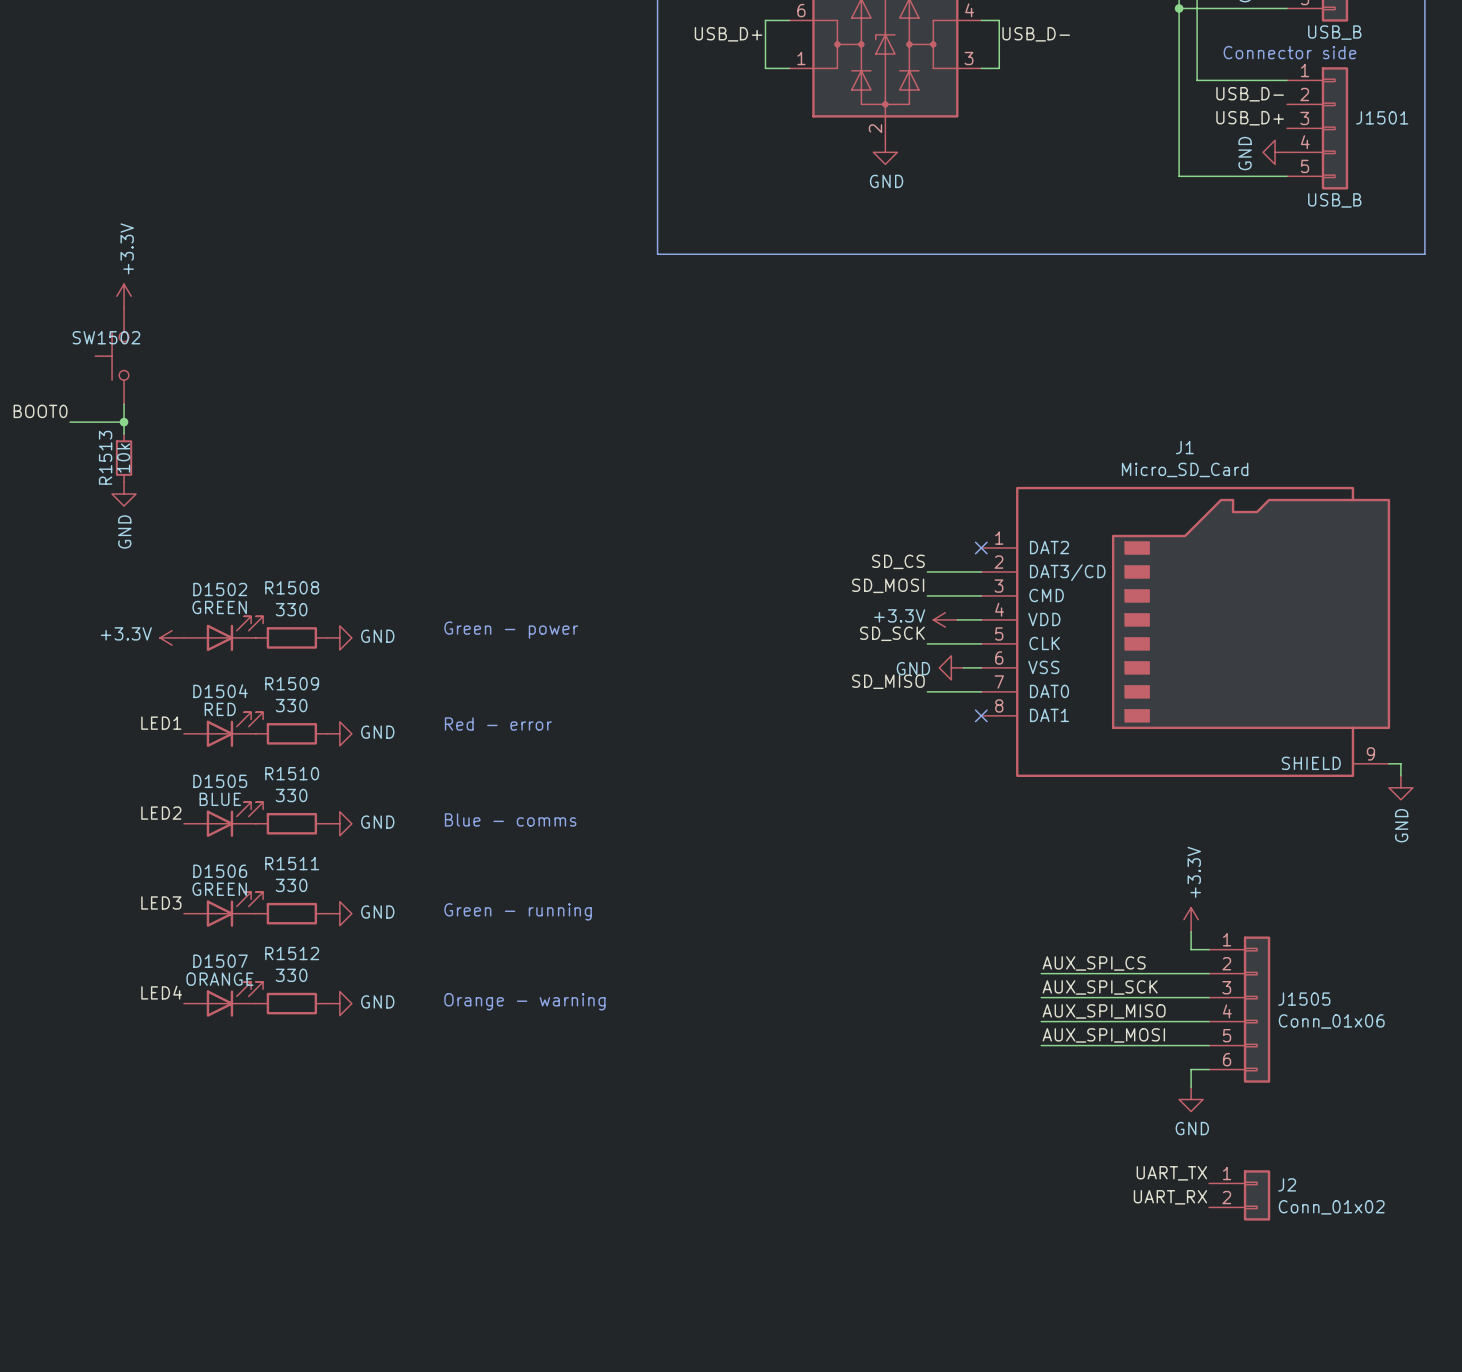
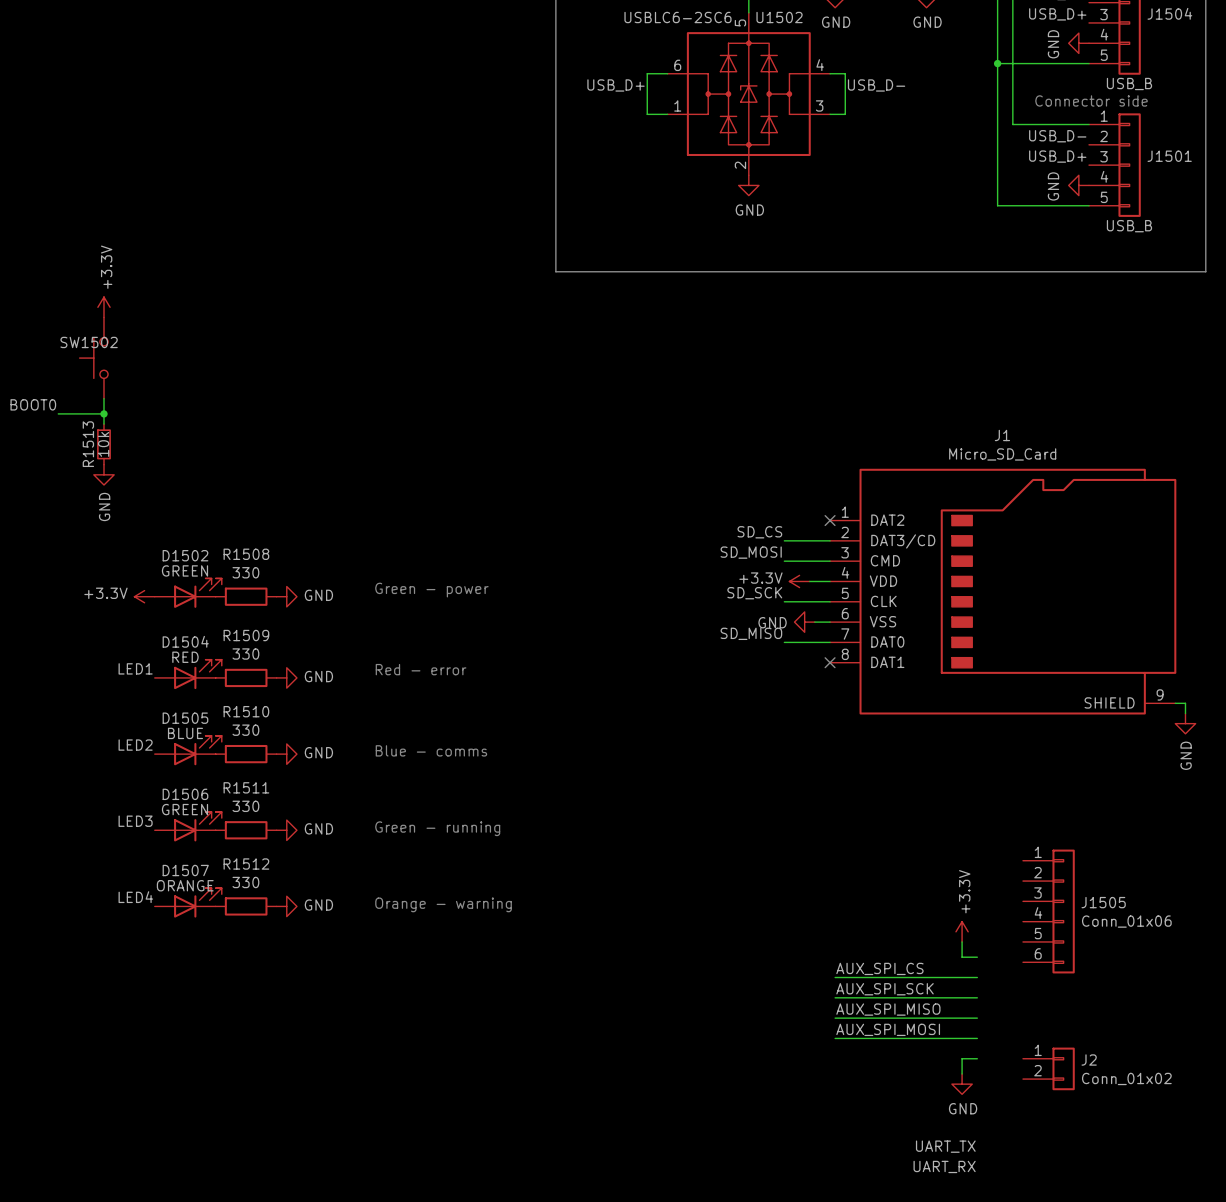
power symbol position: +3.3V (1191, 919) -> +3.3V (962, 931)
wire: (1191, 931) (1191, 949) (1209, 949) -> (962, 941) (962, 957) (977, 957)
label position: AUX_SPI_CS (1094, 963) -> AUX_SPI_CS (879, 968)
wire: (1041, 973) (1209, 973) -> (835, 977) (977, 977)
label position: AUX_SPI_SCK (1100, 987) -> AUX_SPI_SCK (885, 989)
wire: (1041, 997) (1209, 997) -> (835, 997) (977, 997)
label position: AUX_SPI_MISO (1104, 1011) -> AUX_SPI_MISO (888, 1009)
wire: (1041, 1021) (1209, 1021) -> (835, 1018) (977, 1018)
label position: AUX_SPI_MOSI (1103, 1035) -> AUX_SPI_MOSI (888, 1029)
wire: (1041, 1045) (1209, 1045) -> (835, 1038) (977, 1038)
wire: (1209, 1069) (1191, 1069) (1191, 1087) -> (977, 1058) (962, 1058) (962, 1073)
power symbol position: GND (1191, 1099) -> GND (962, 1084)
label position: UART_TX (1171, 1173) -> UART_TX (945, 1146)
label position: UART_RX (1170, 1197) -> UART_RX (944, 1166)

